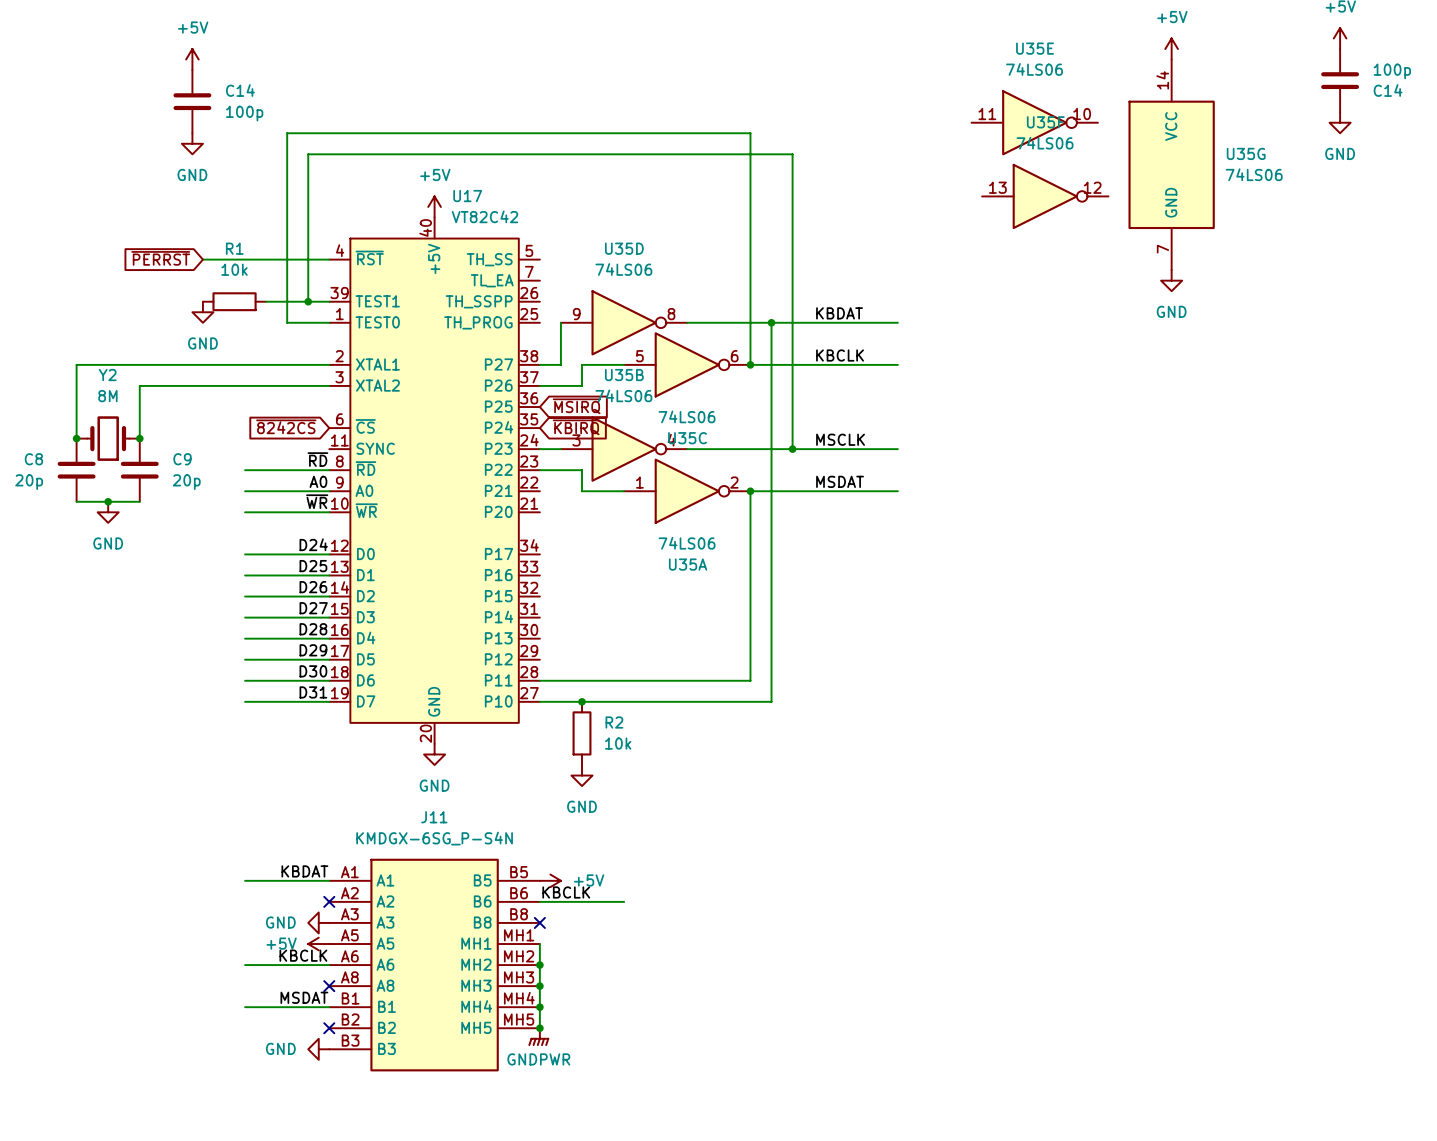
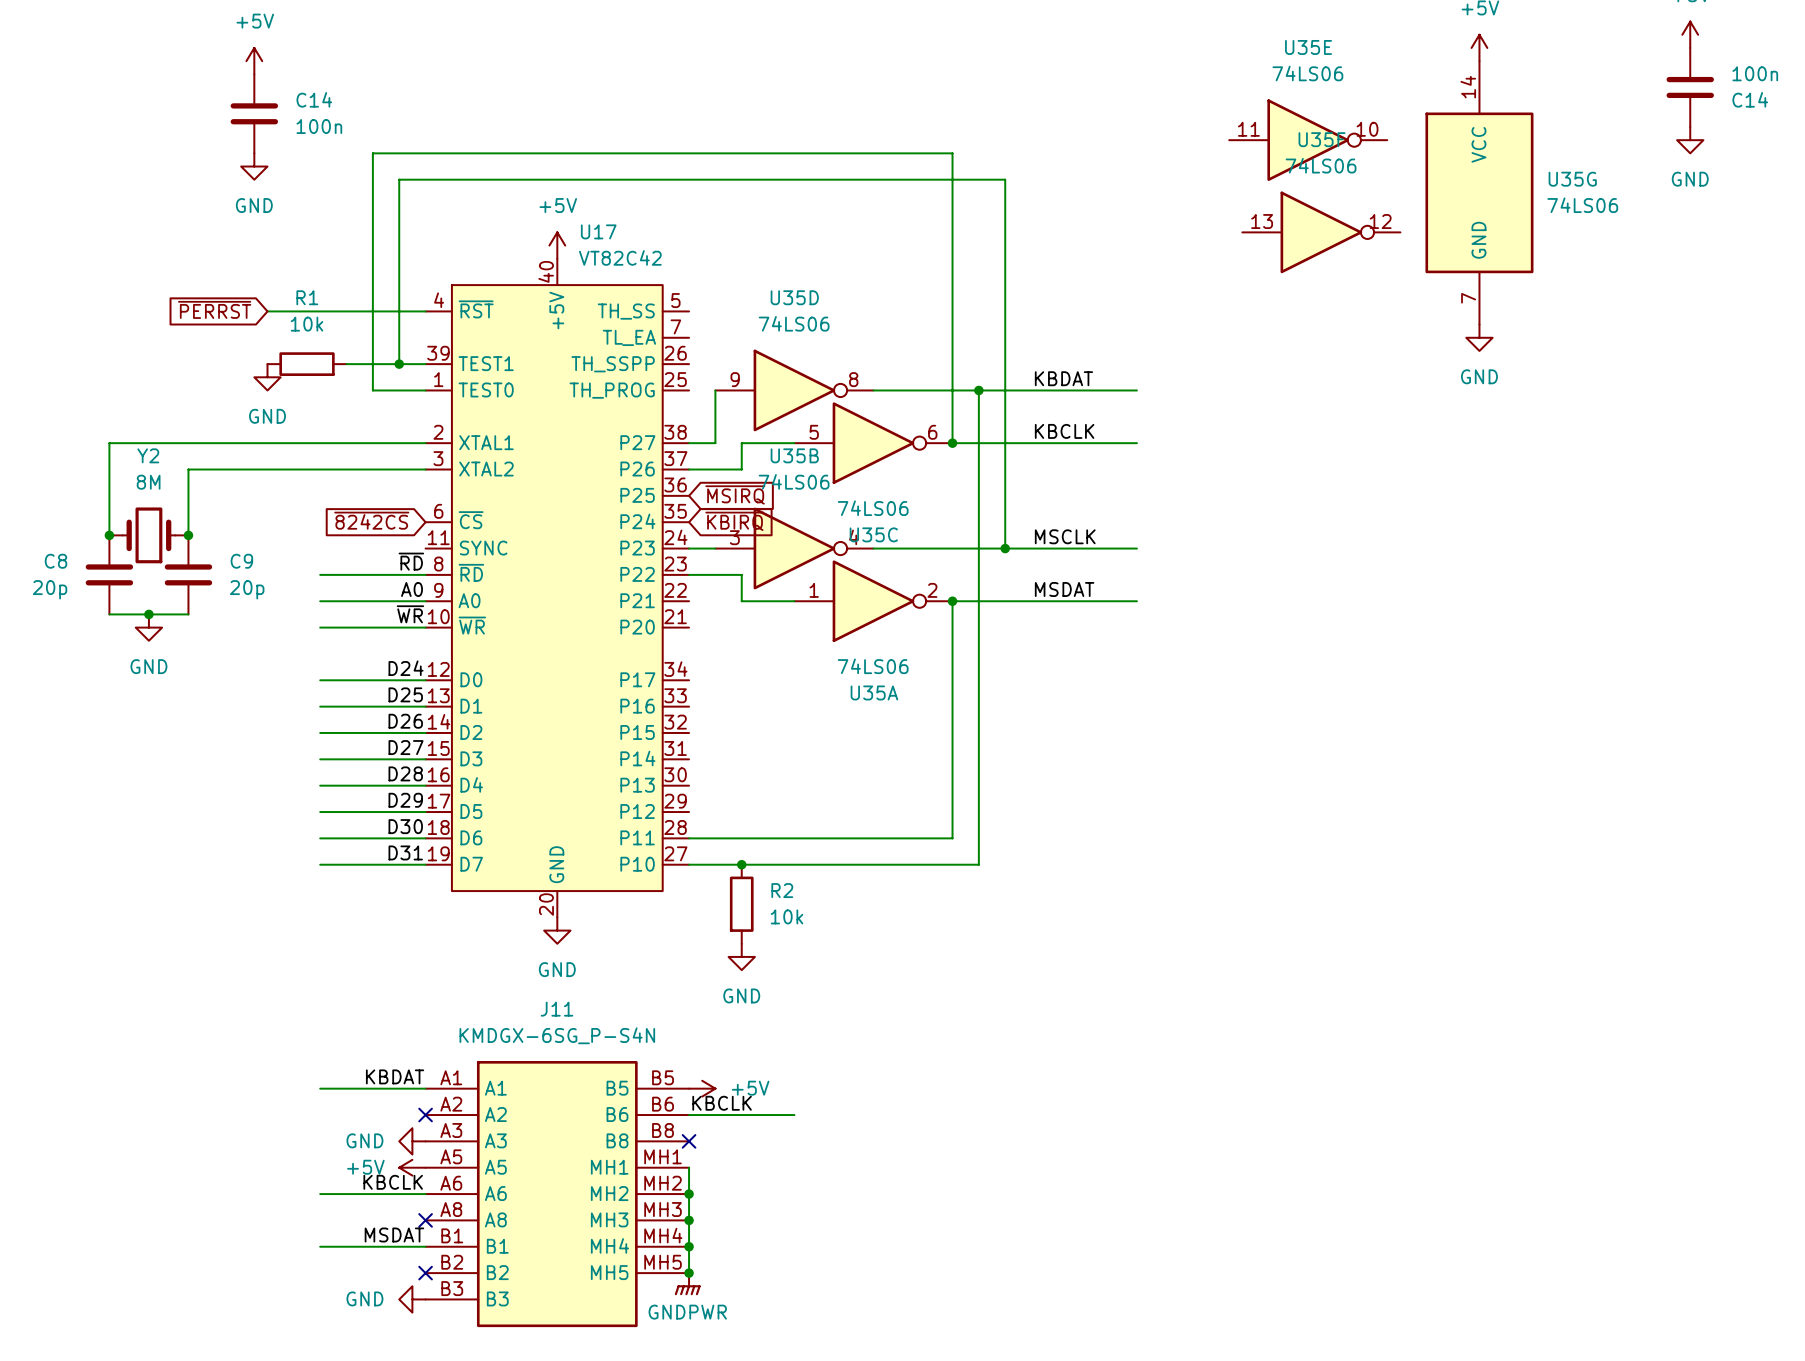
C14 value: 100p (1392, 71) -> 100n (1755, 73)
C14 value: 100p (244, 113) -> 100n (319, 126)

